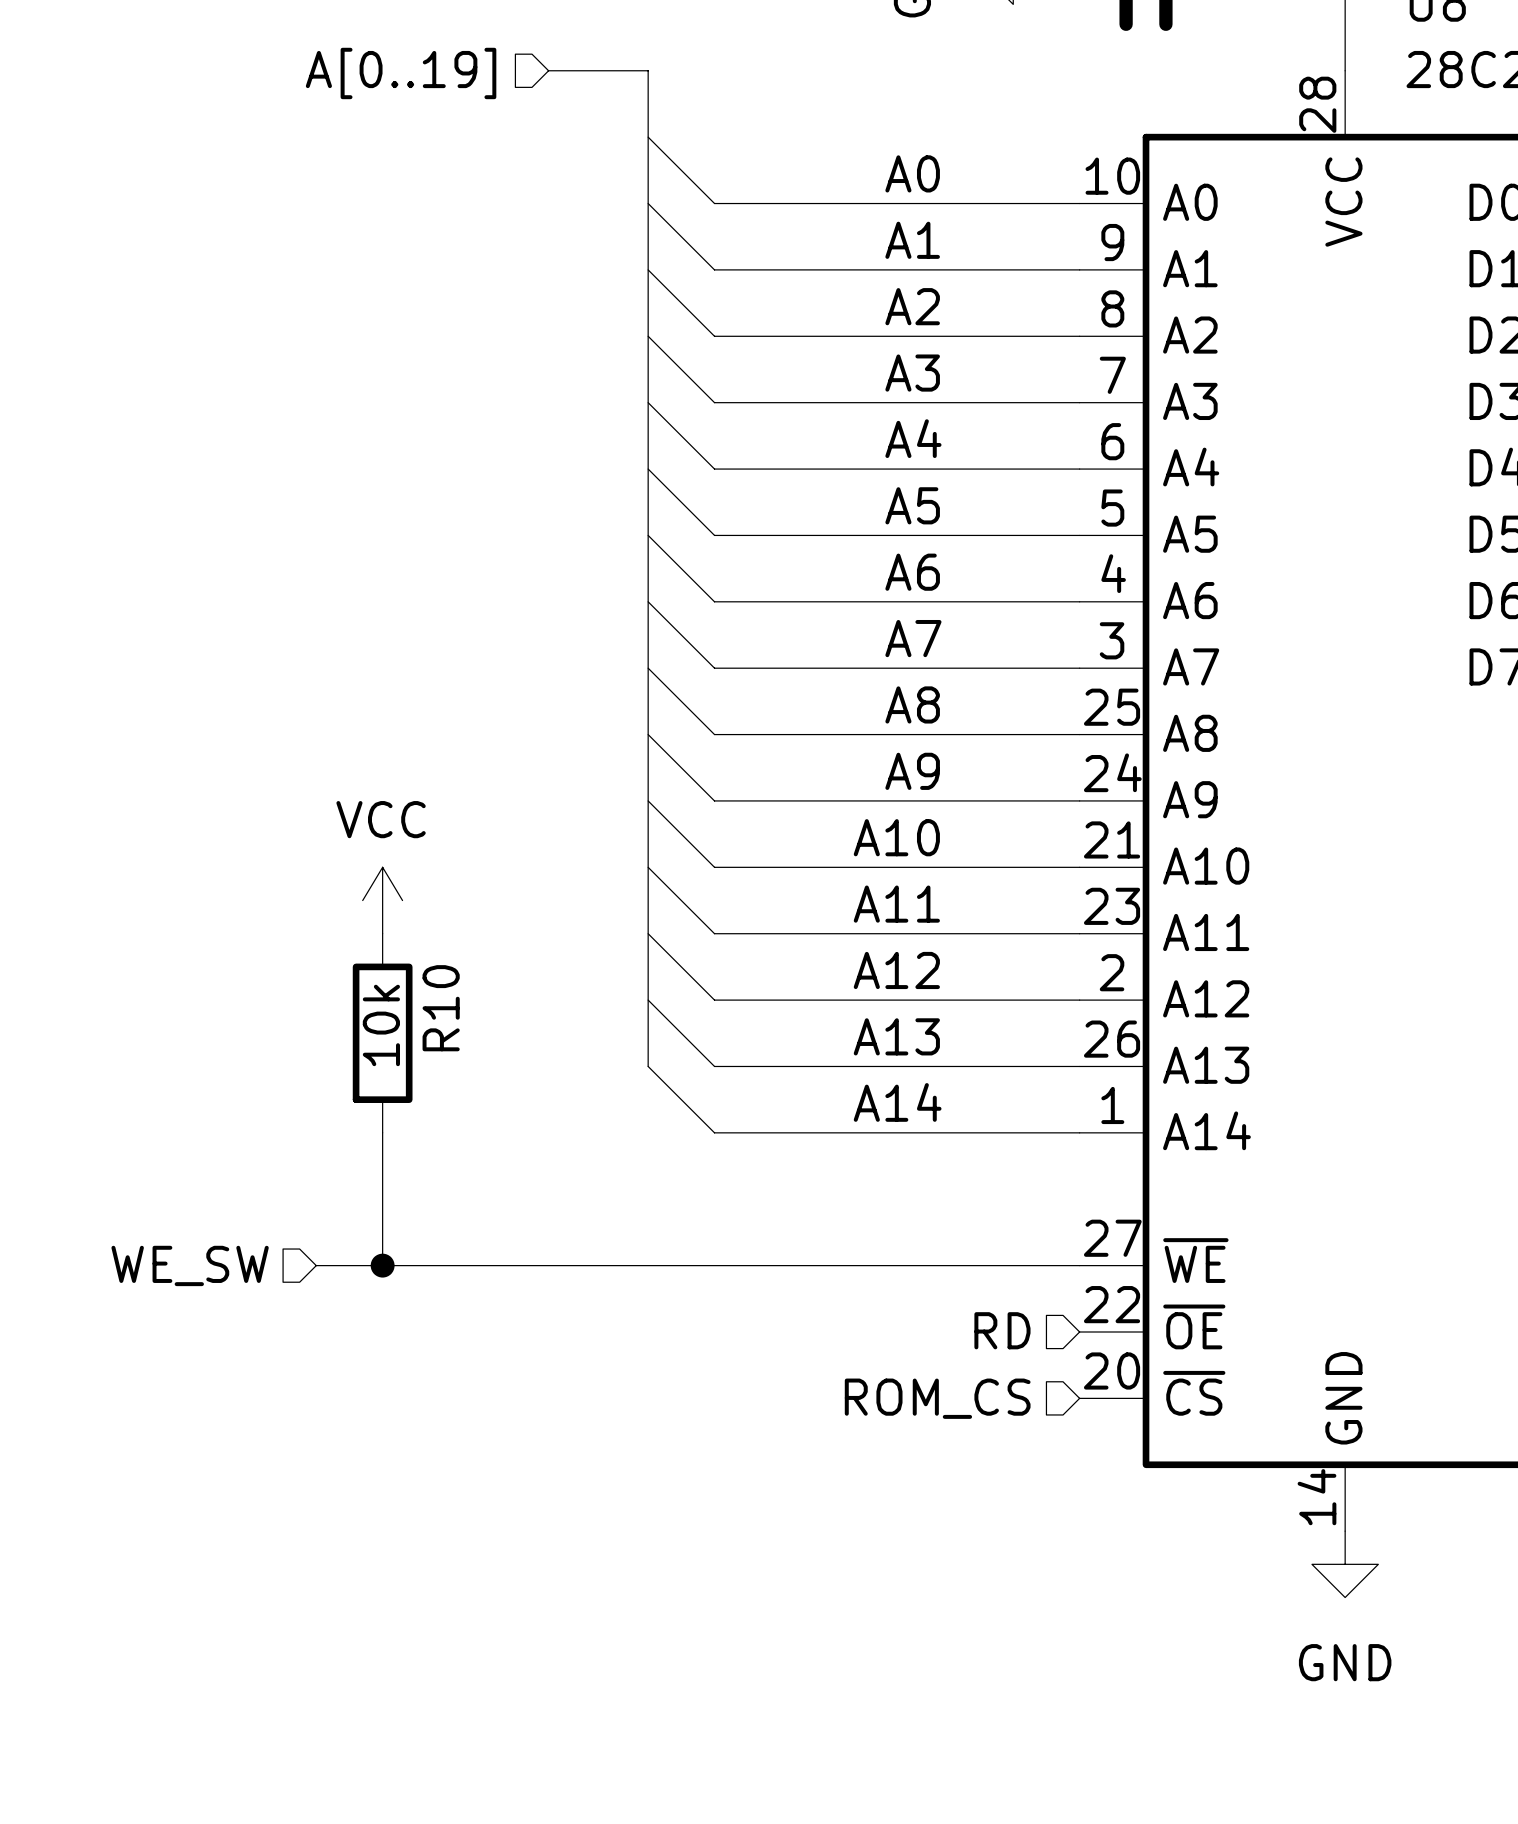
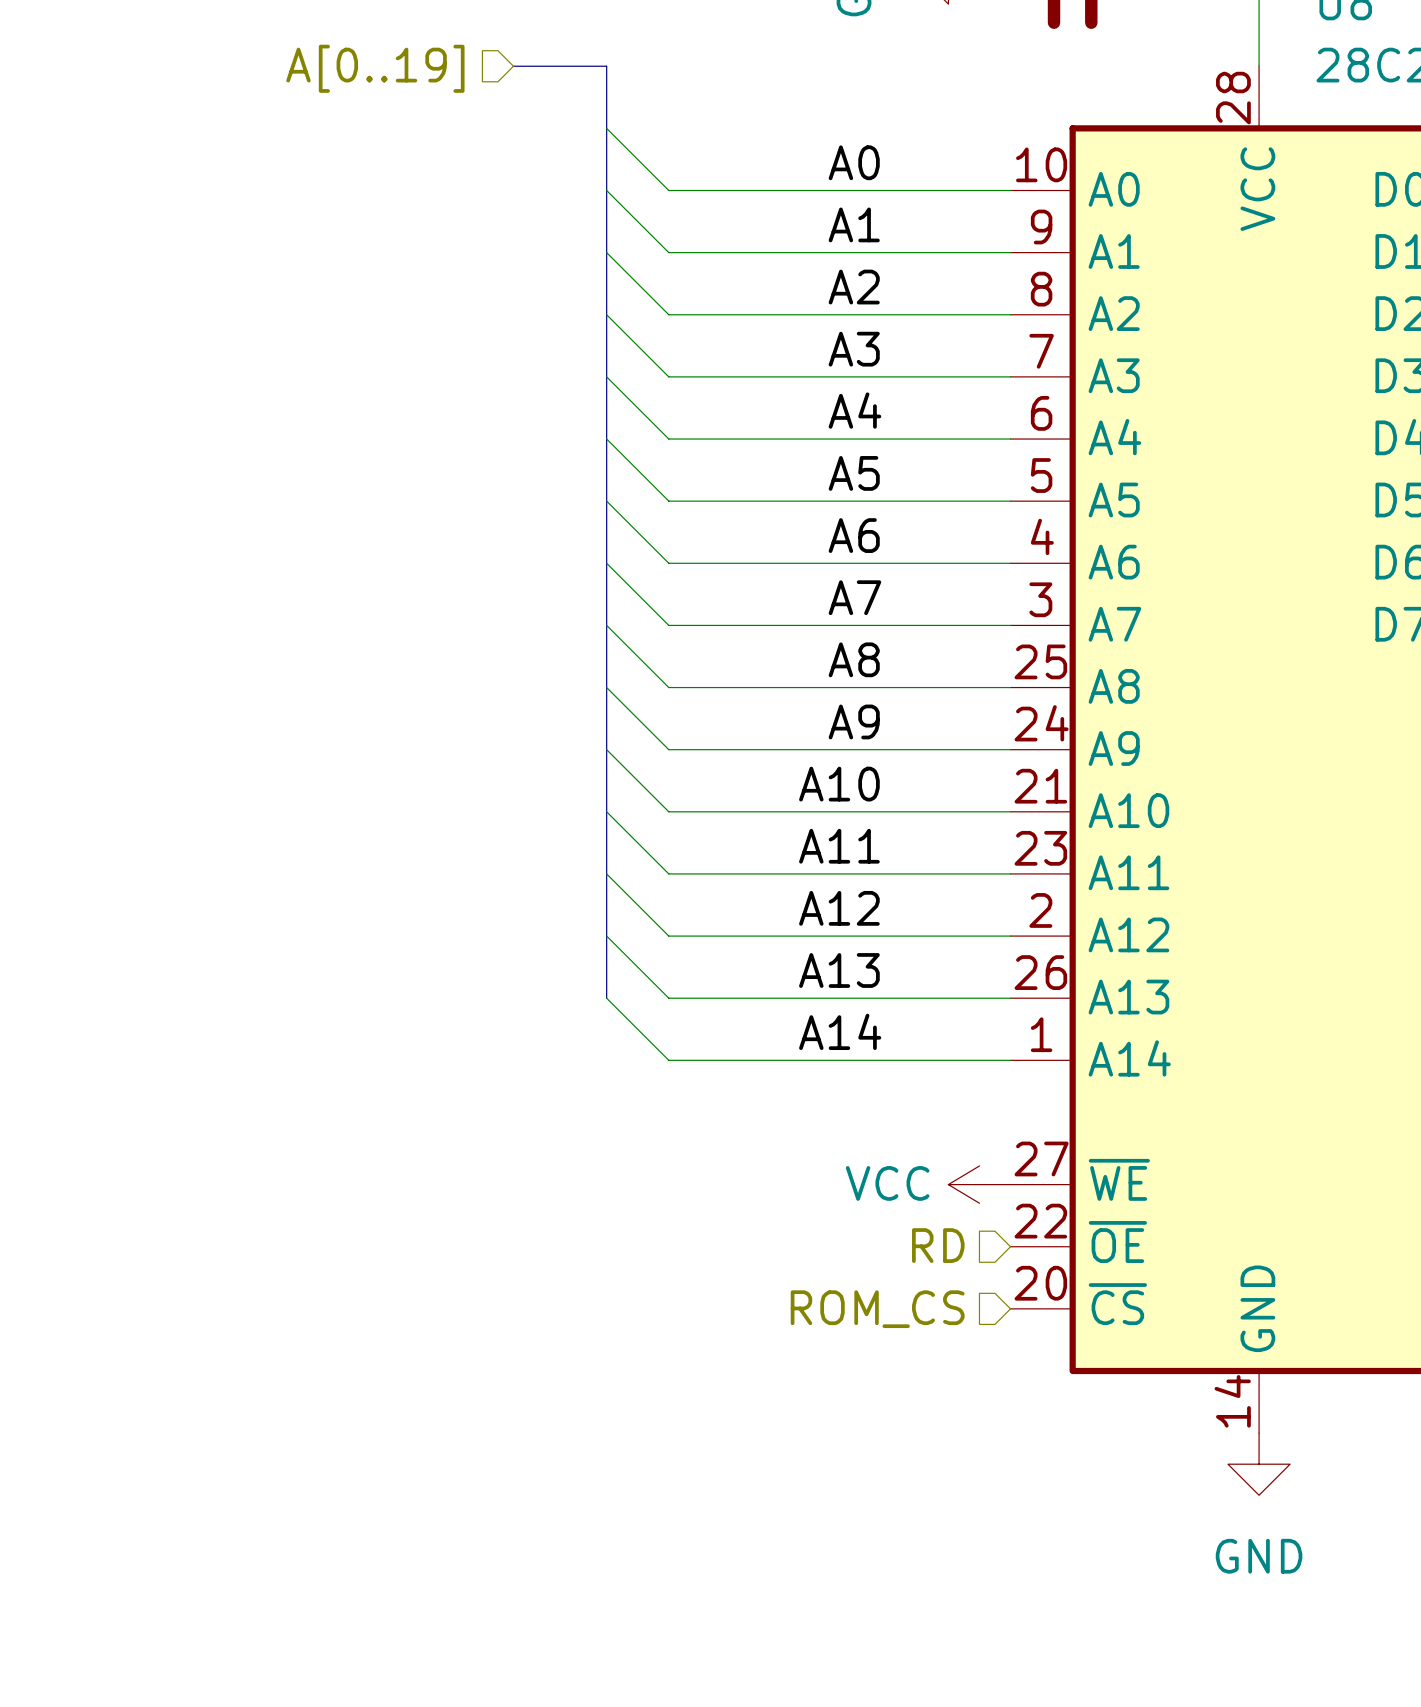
power symbol: VCC (382, 900) -> none
R10: 10k (382, 1033) -> none
wire: (382, 1132) (382, 1265) -> none
hierarchical label: WE_SW (190, 1265) -> none
wire: (316, 1265) (1079, 1265) -> none
junction: (382, 1265) -> none
power symbol: none -> VCC (979, 1184)

